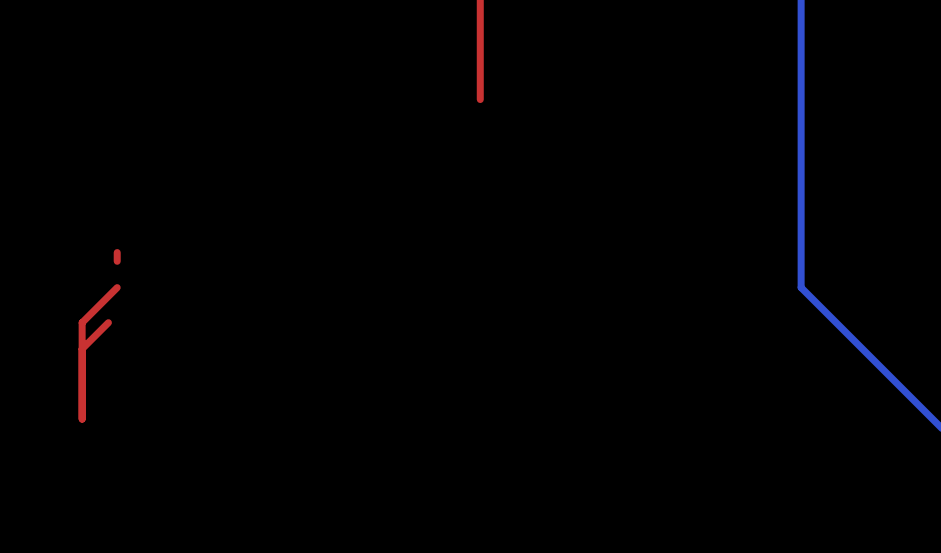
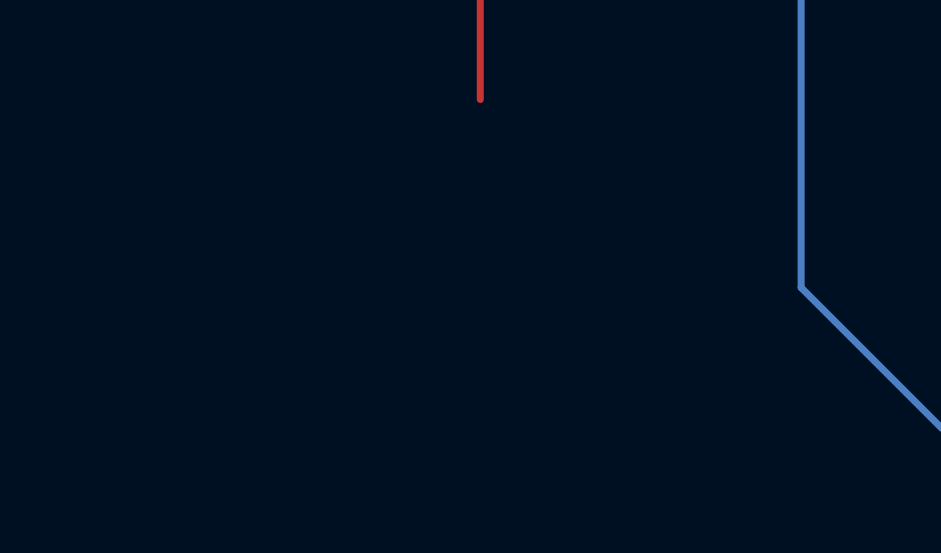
top track: (117, 252) (117, 261) -> none
top track: (117, 287) (82, 322) (82, 419) -> none
top track: (108, 322) (82, 348) -> none

